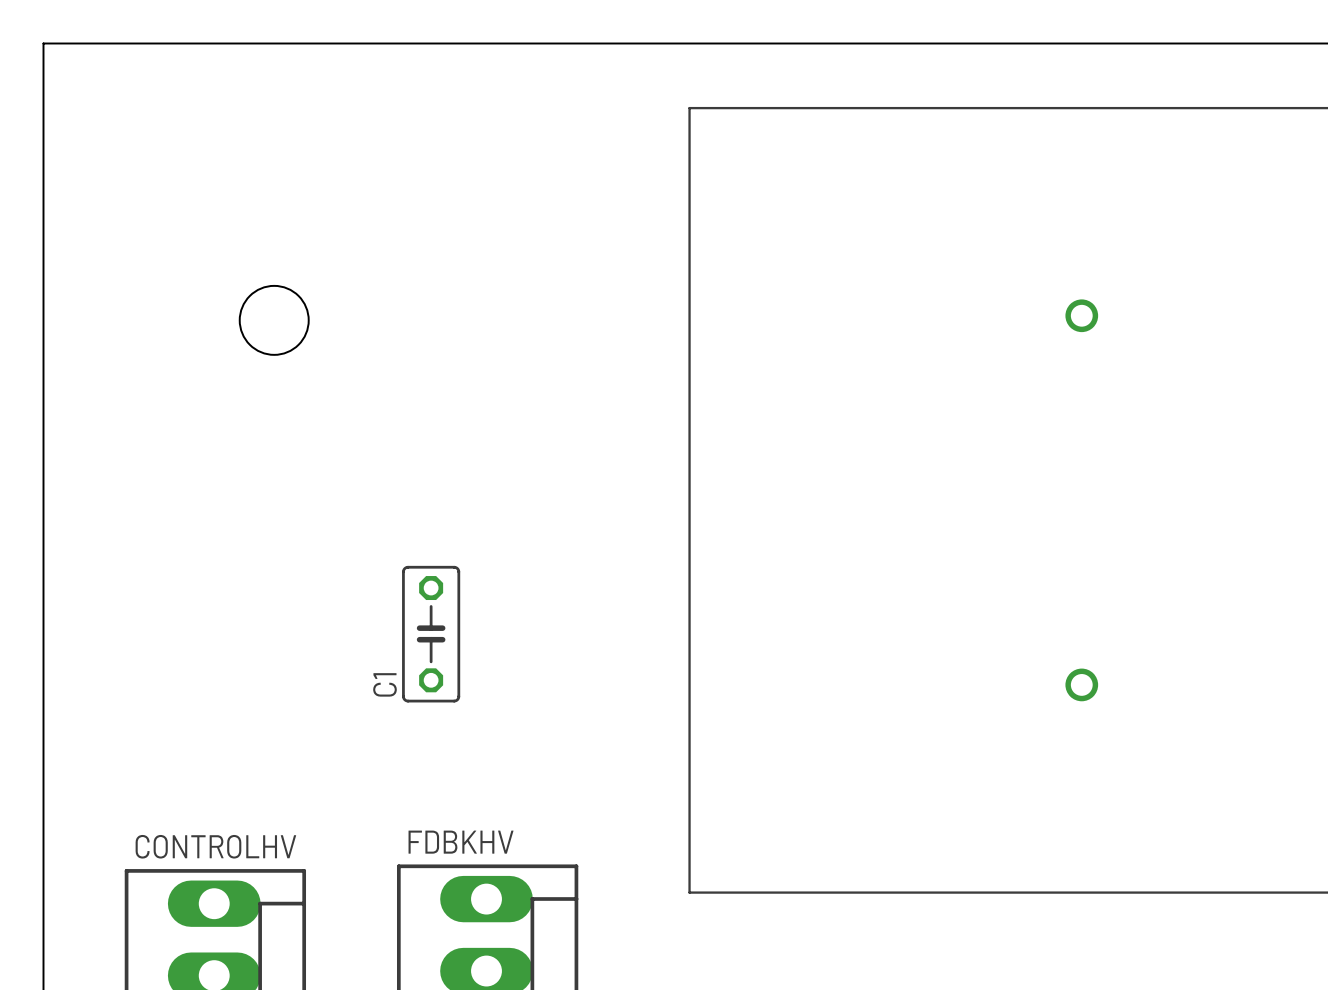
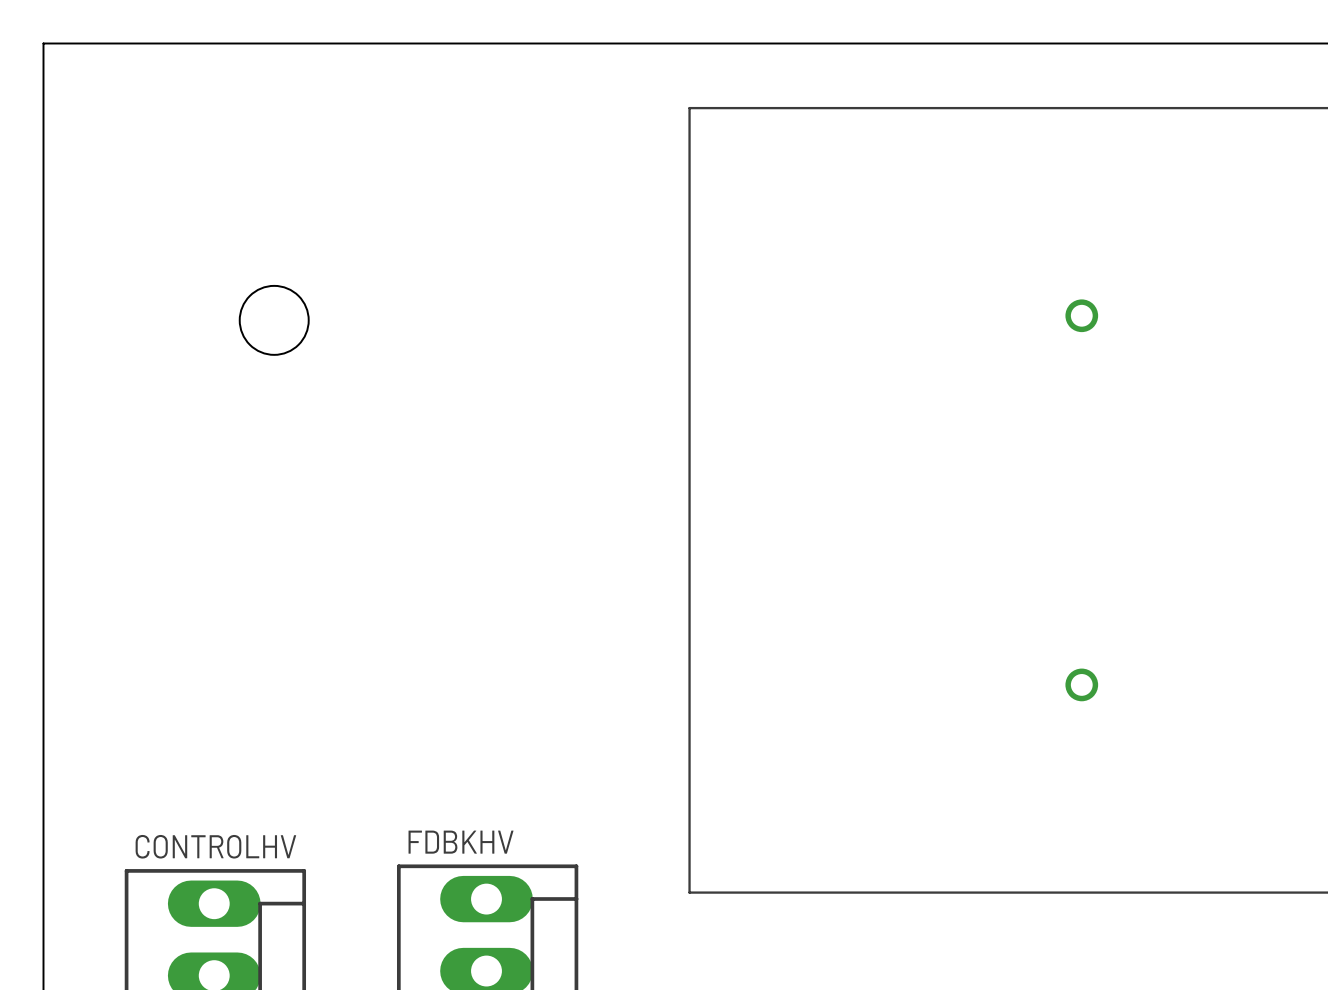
C1: (431, 634) -> none

